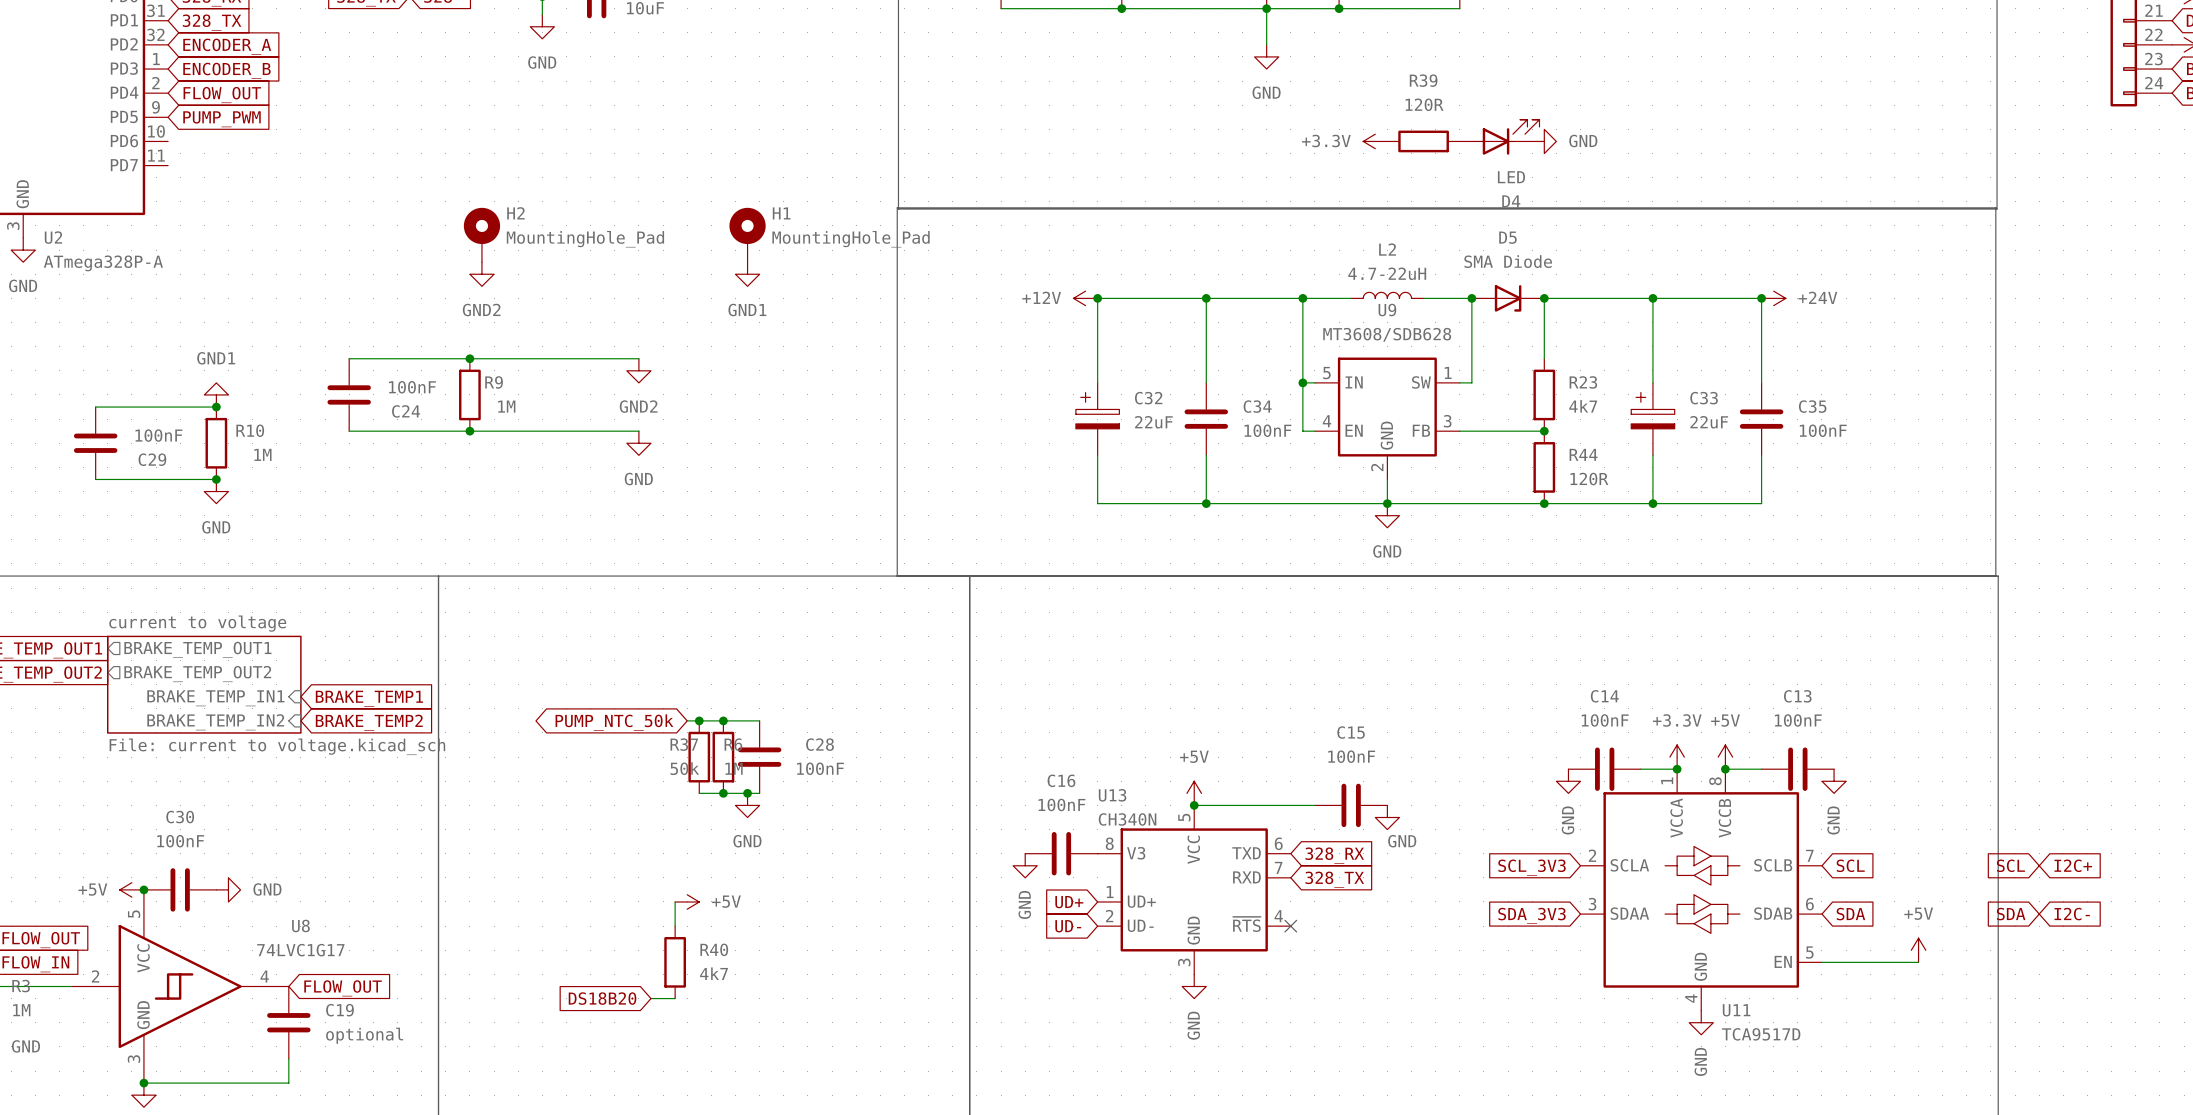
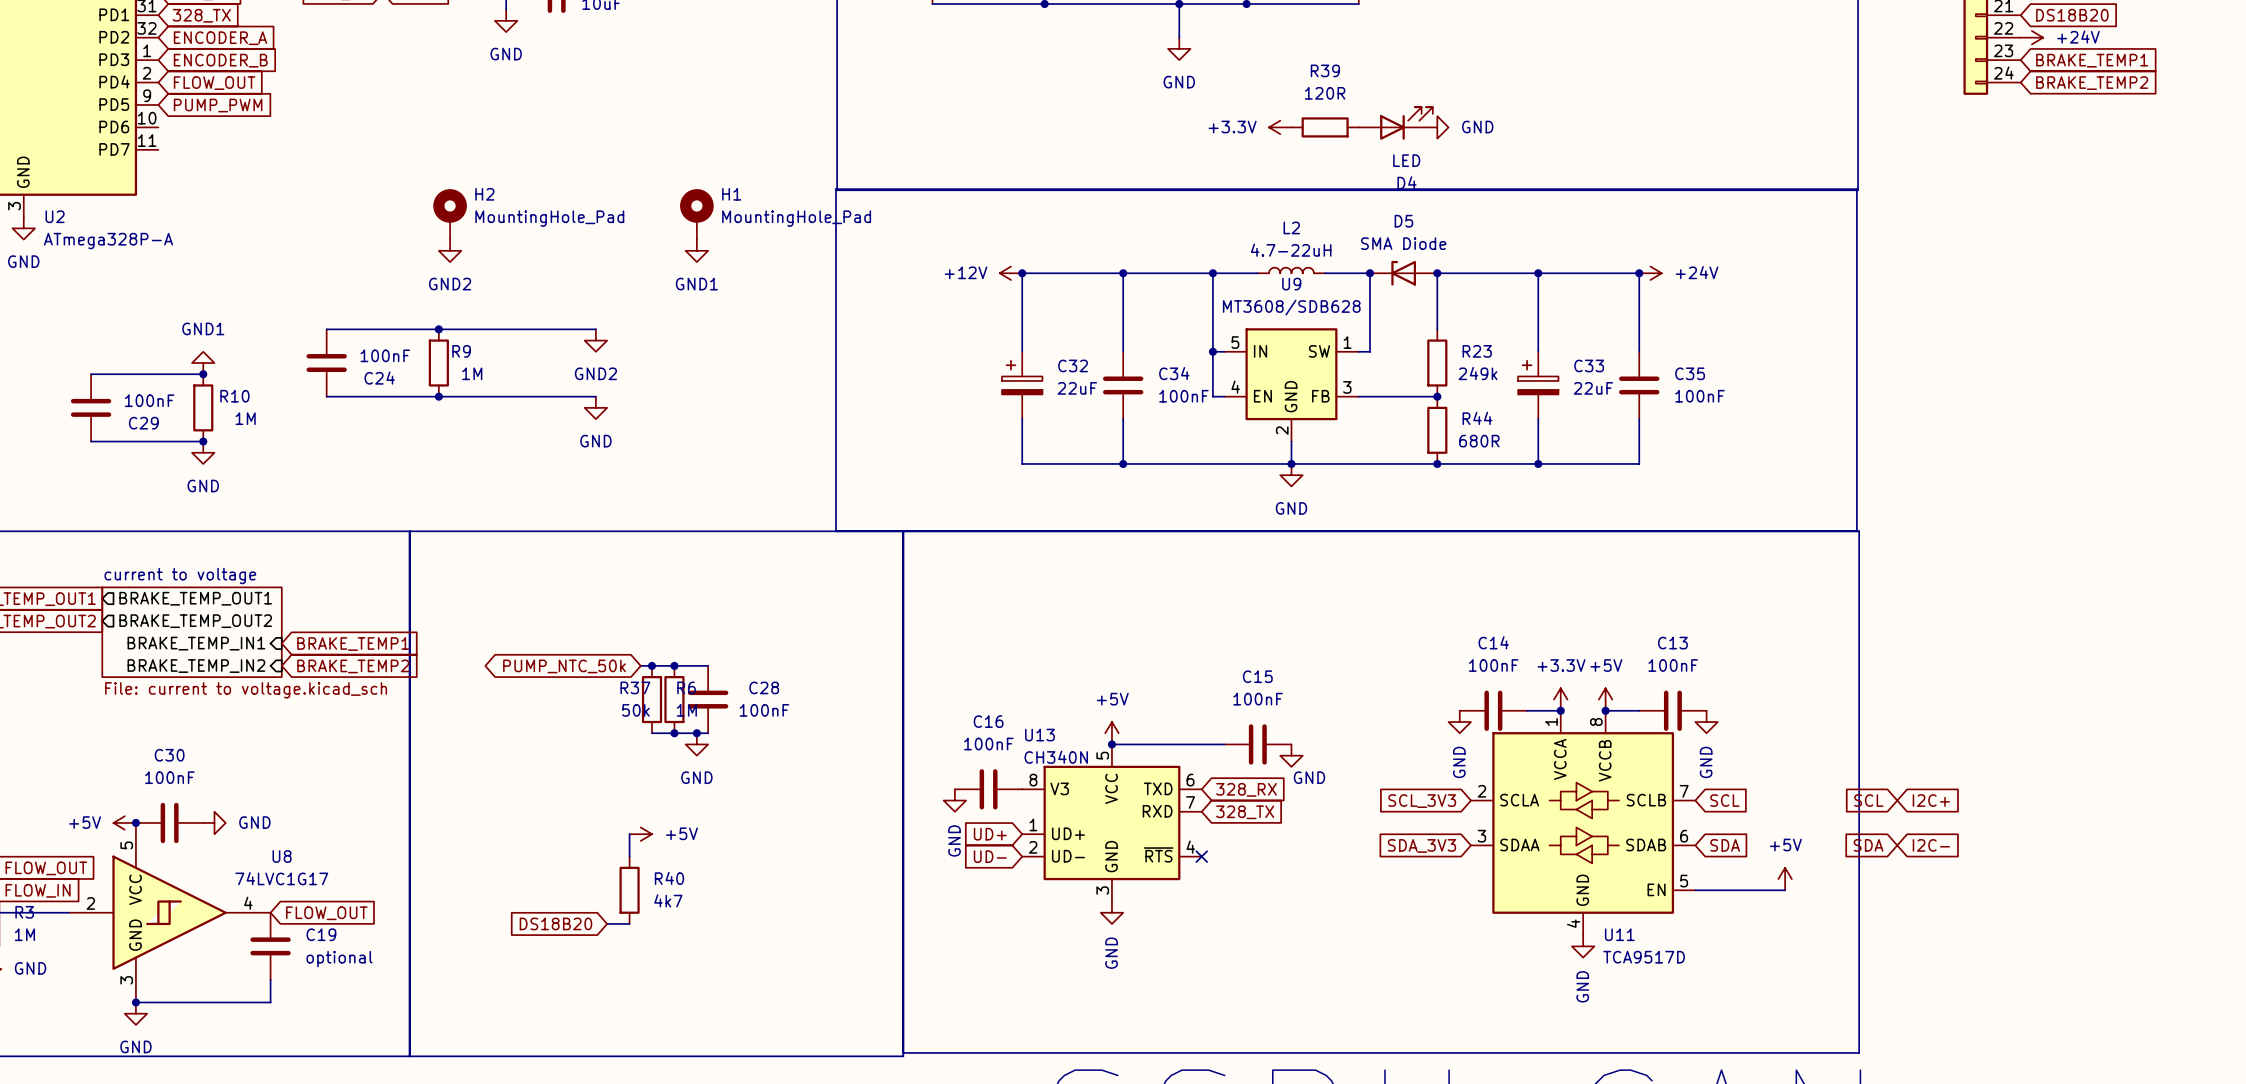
D5 rotation: 0° (1508, 298) -> 180° (1403, 273)
R23 value: 4k7 (1583, 406) -> 249k (1478, 373)
R44 value: 120R (1589, 479) -> 680R (1479, 441)

